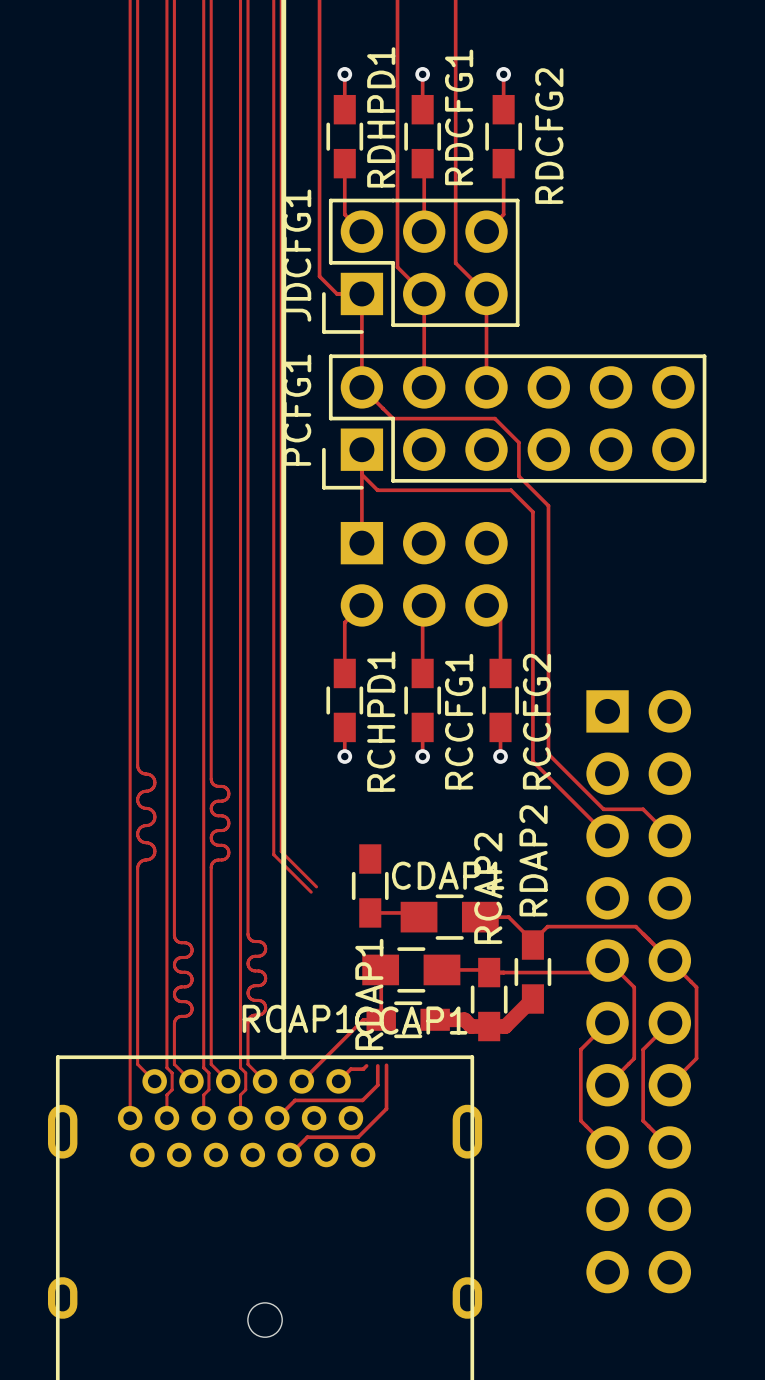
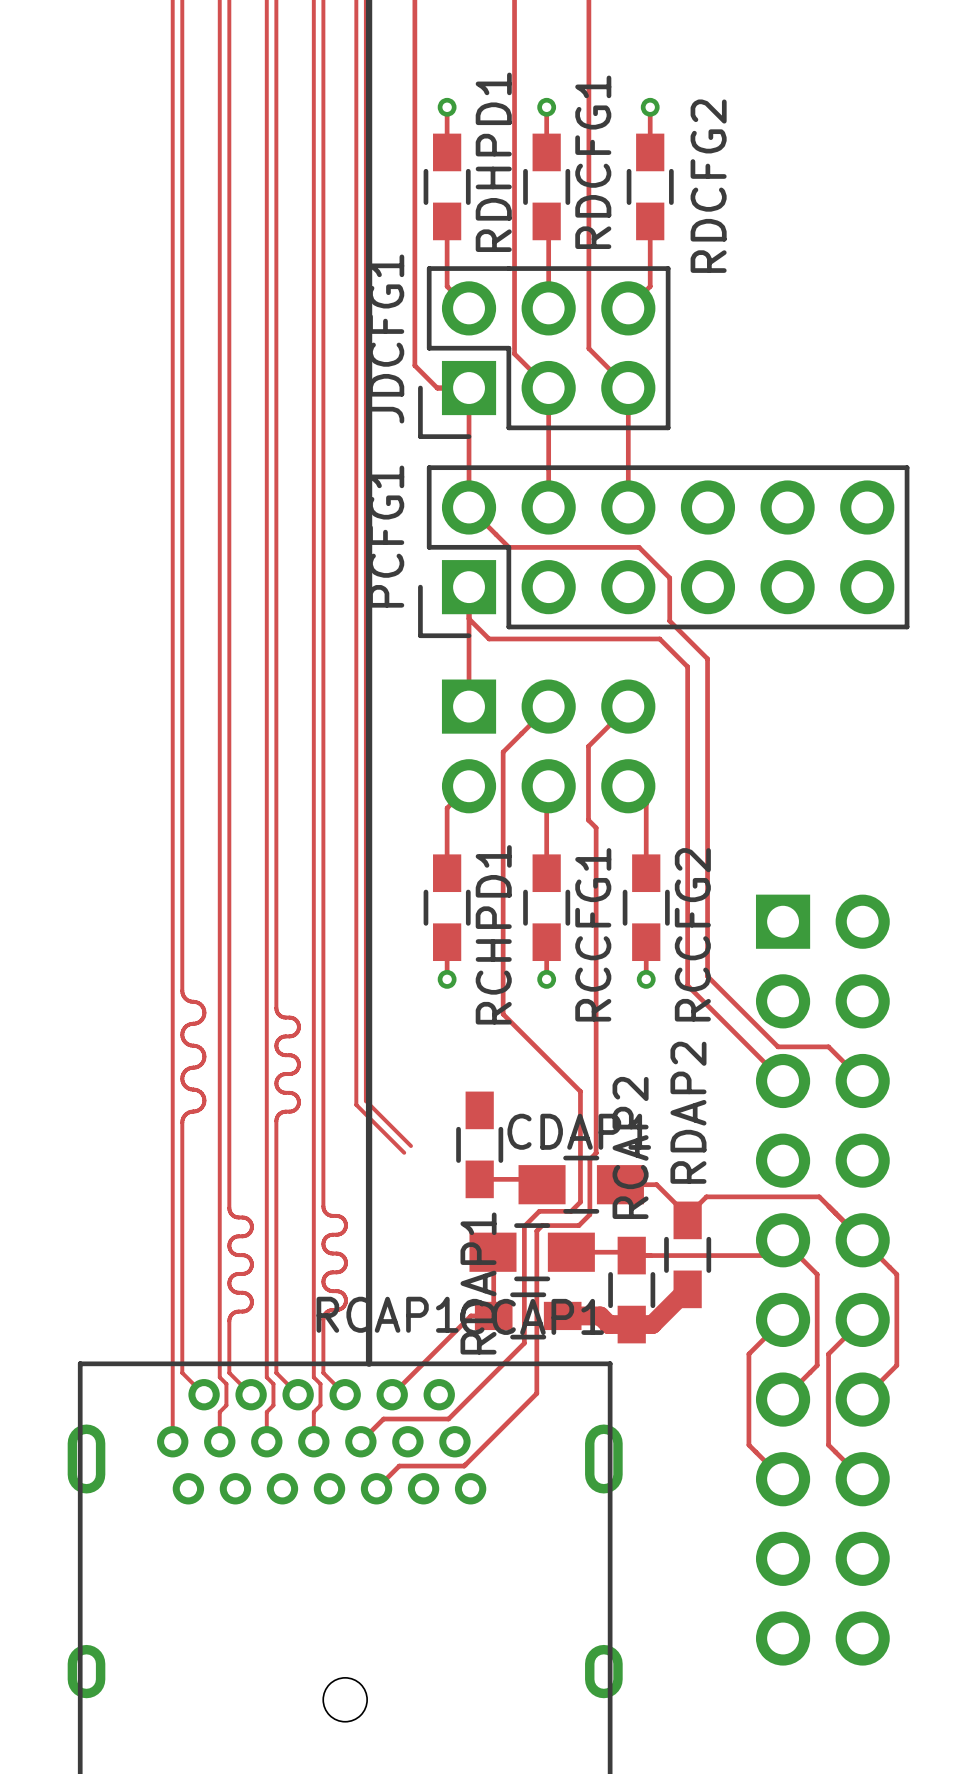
track: (366, 1065) (363, 1069) (350, 1069) (338, 1081) -> none
track: (377, 1065) (377, 1085) (362, 1100) (345, 1100) -> (548, 706) (503, 752) (503, 1014) (580, 1091) (580, 1202) (571, 1211) (539, 1211) (524, 1226) (524, 1343) (448, 1419)
track: (386, 1065) (386, 1108) -> (628, 706) (588, 746) (588, 820) (596, 827) (596, 1153) (589, 1159) (589, 1214) (578, 1225) (542, 1225) (536, 1230) (536, 1393) (500, 1429)

